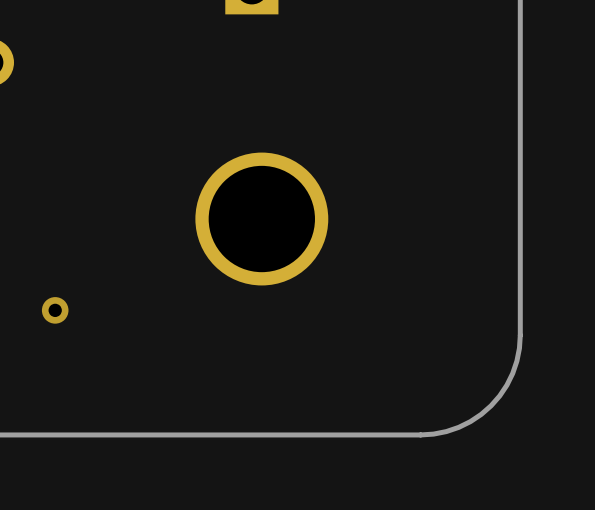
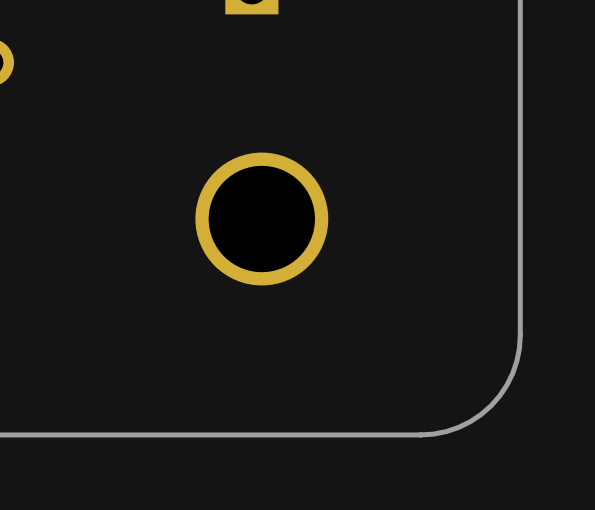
via: (55, 310) -> none

